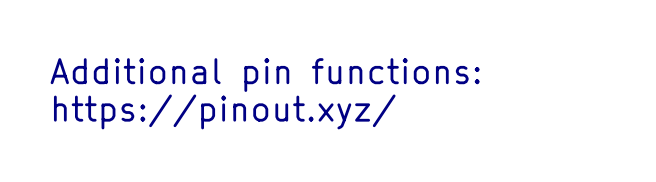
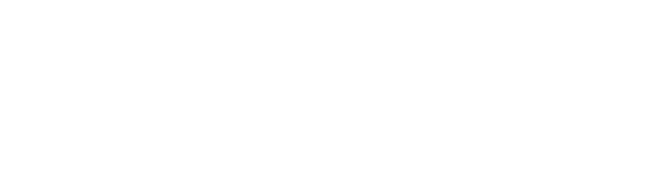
text: Additional pin functions: (265, 75) -> none
text: https://pinout.xyz/ (224, 111) -> none

